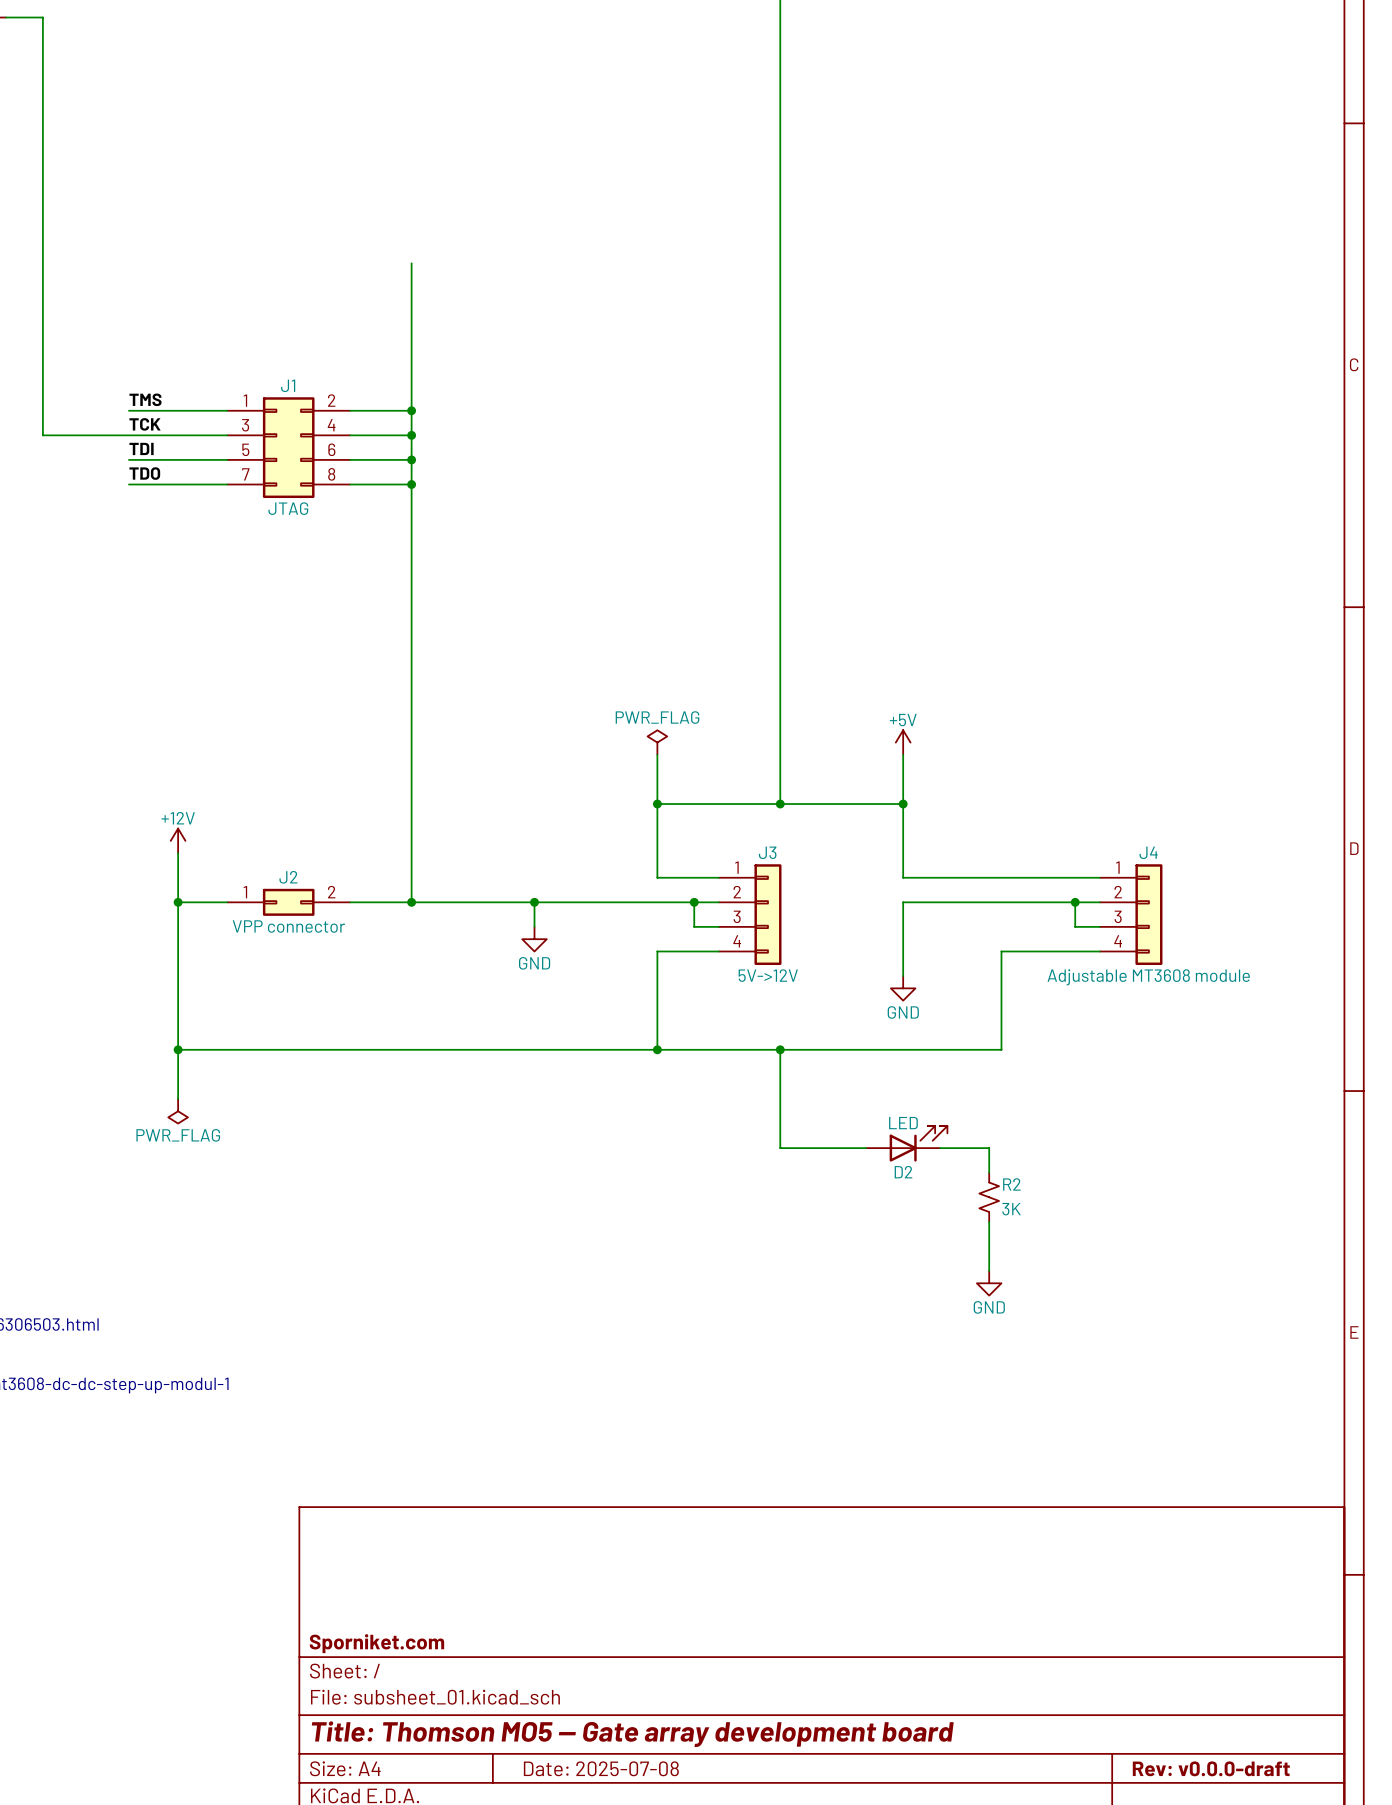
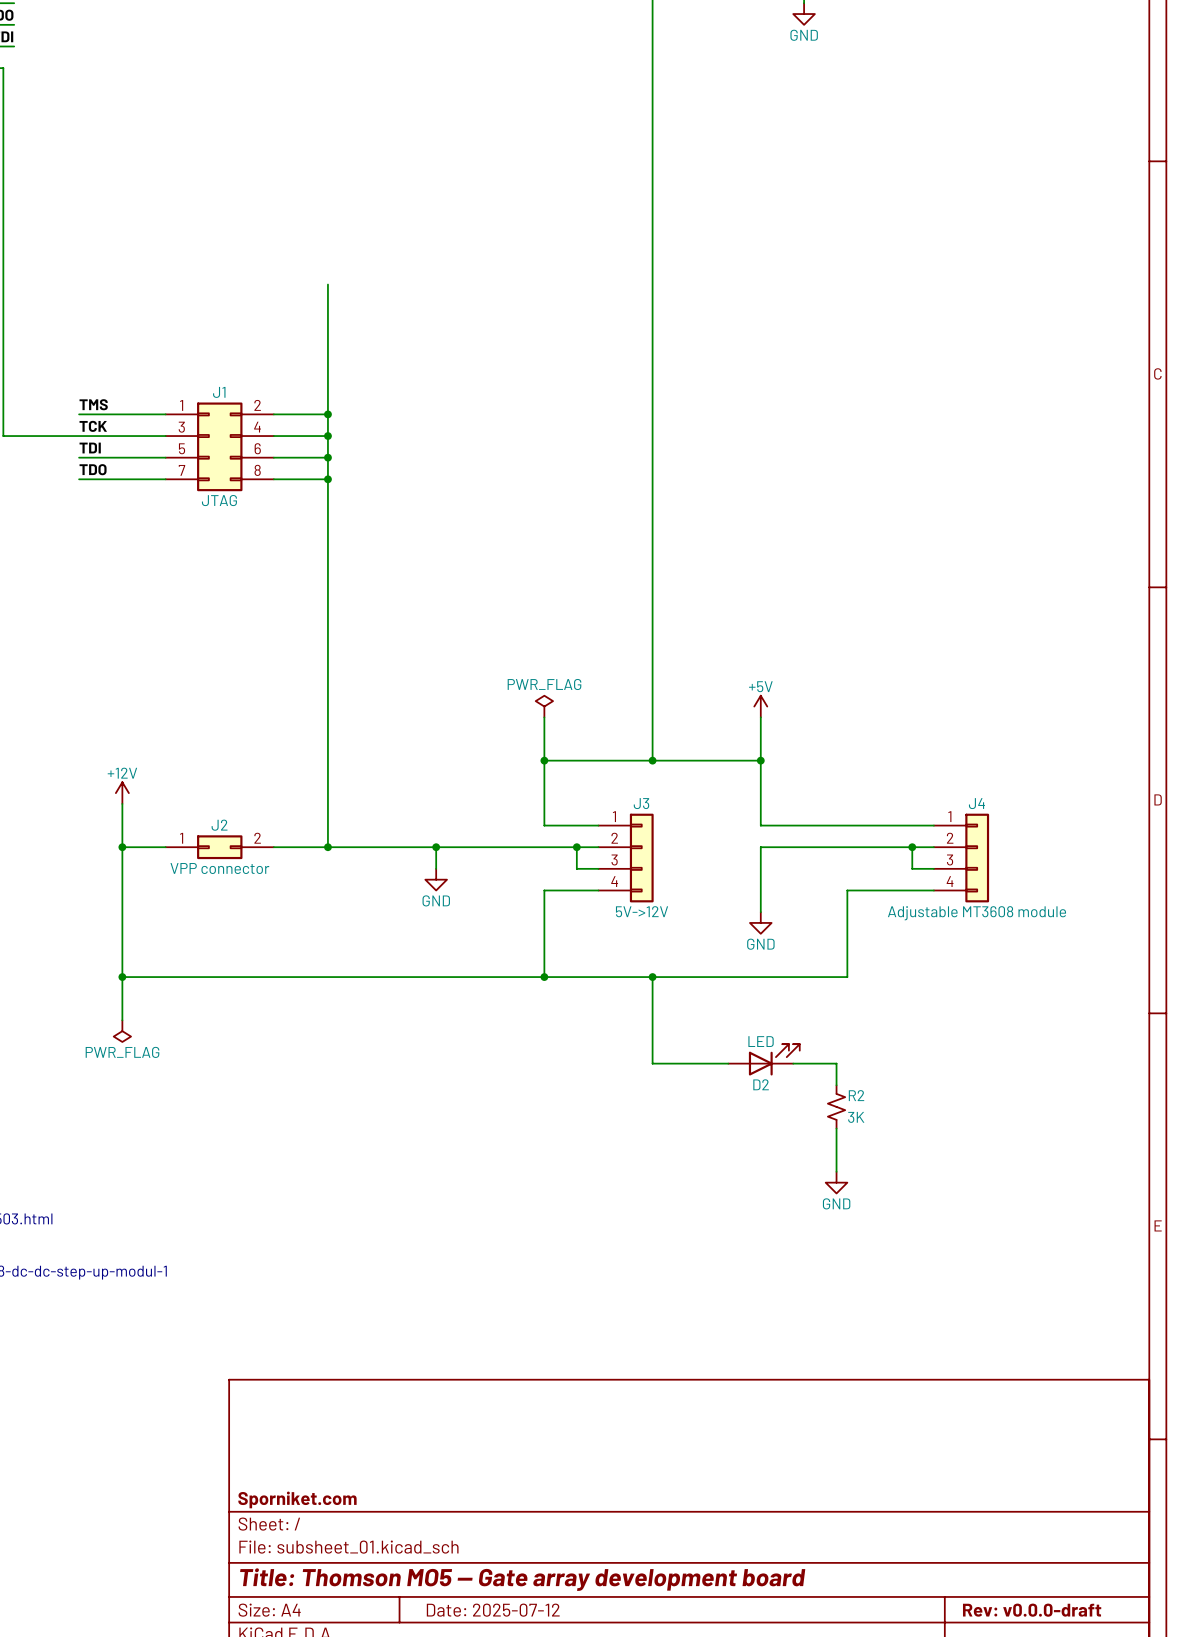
title block: Date: 2025-07-08 (601, 1768) -> Date: 2025-07-12 (493, 1610)

